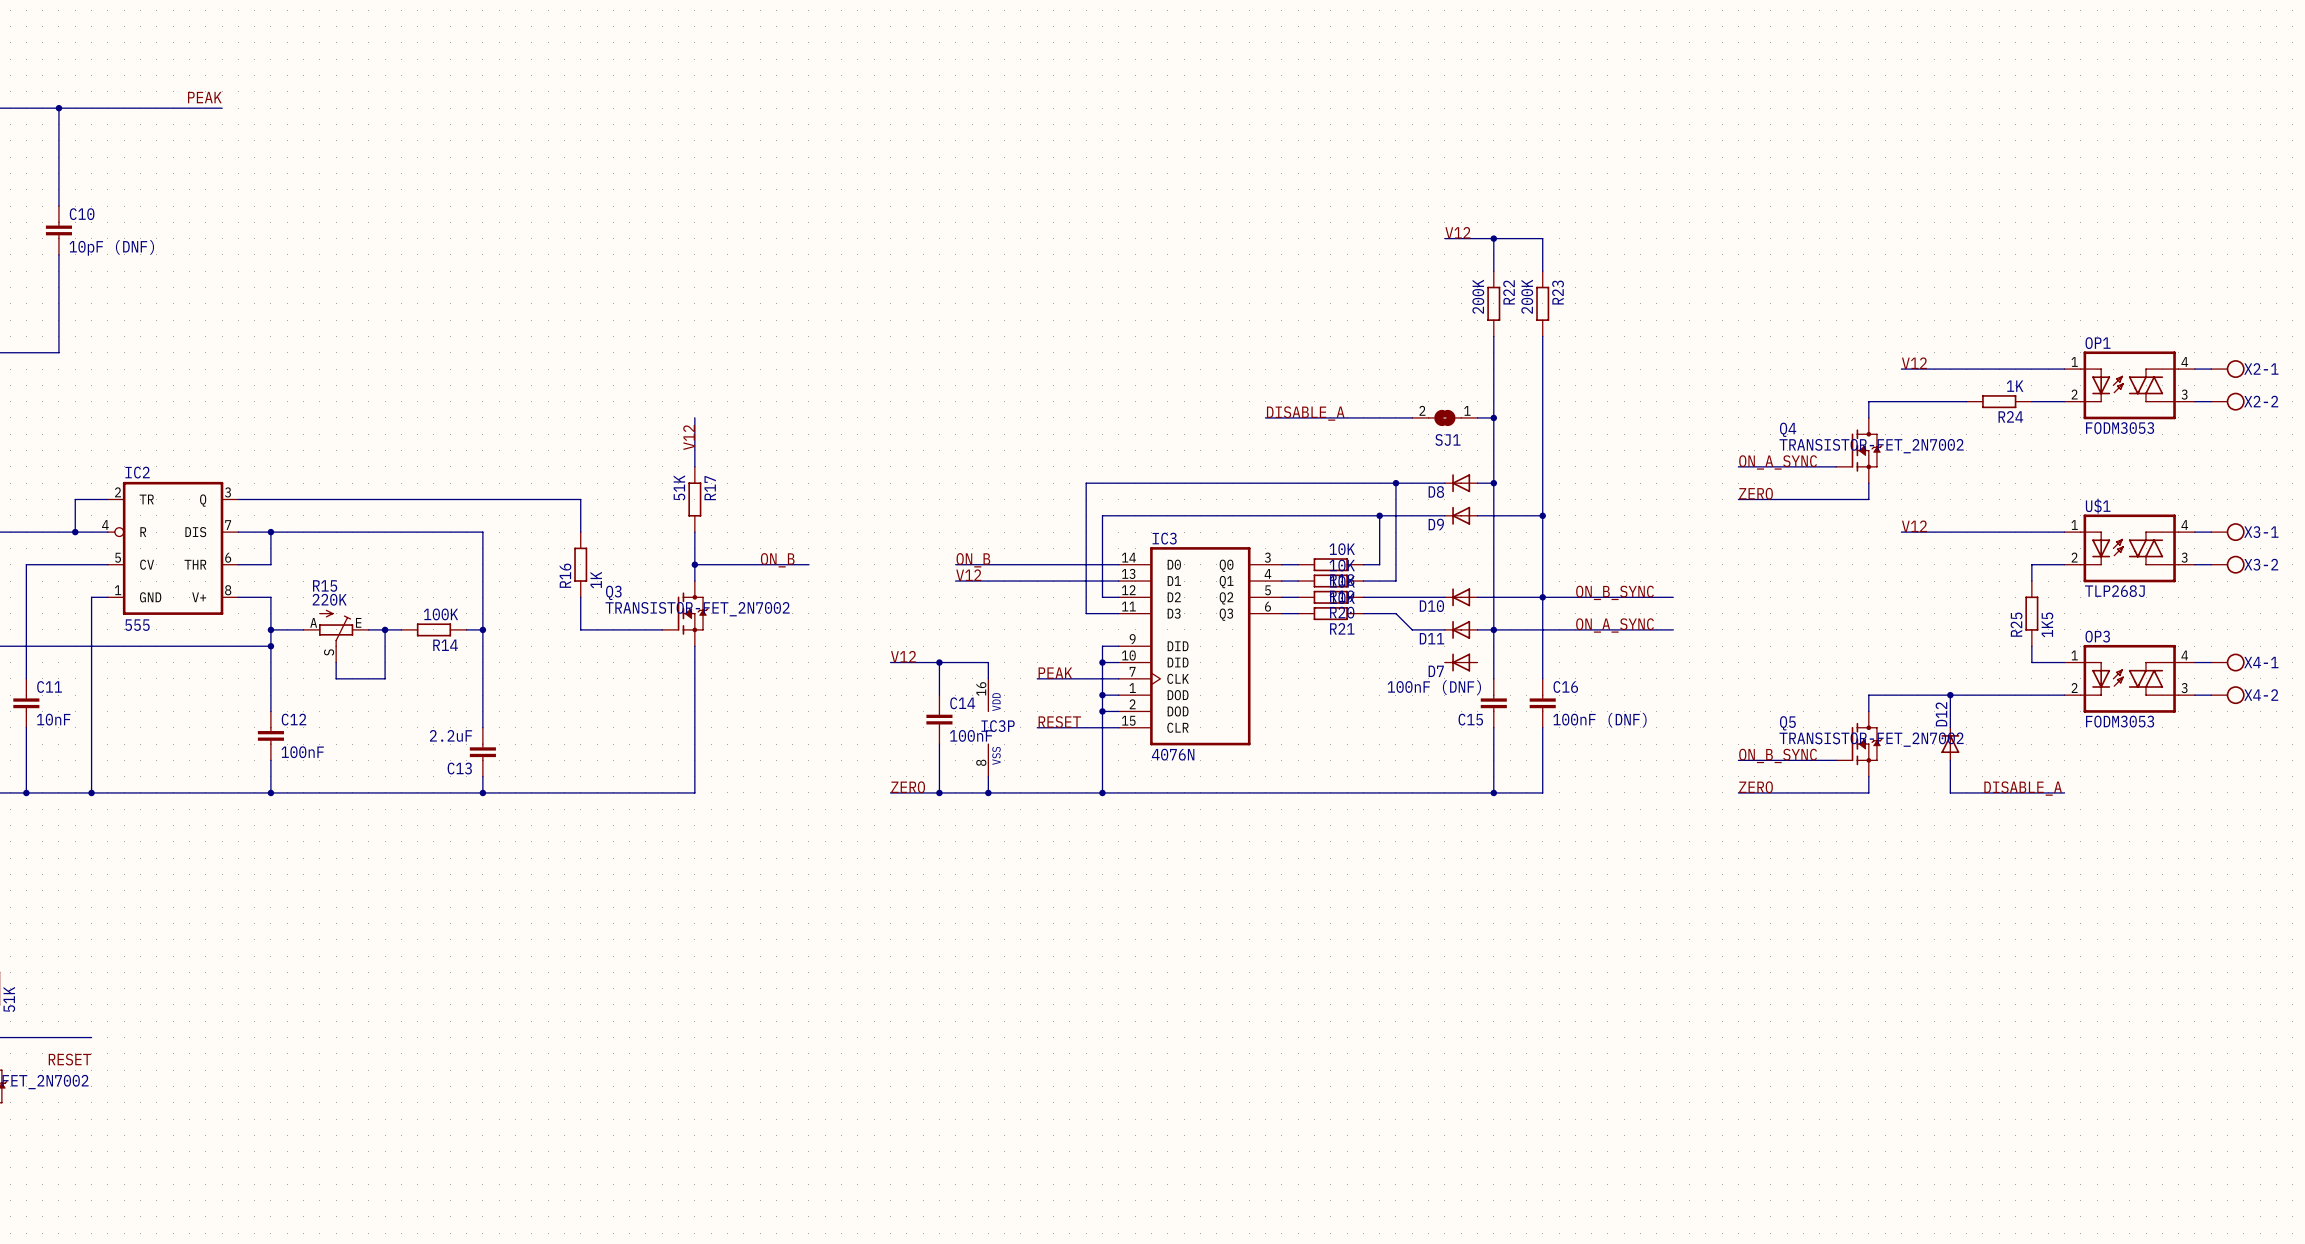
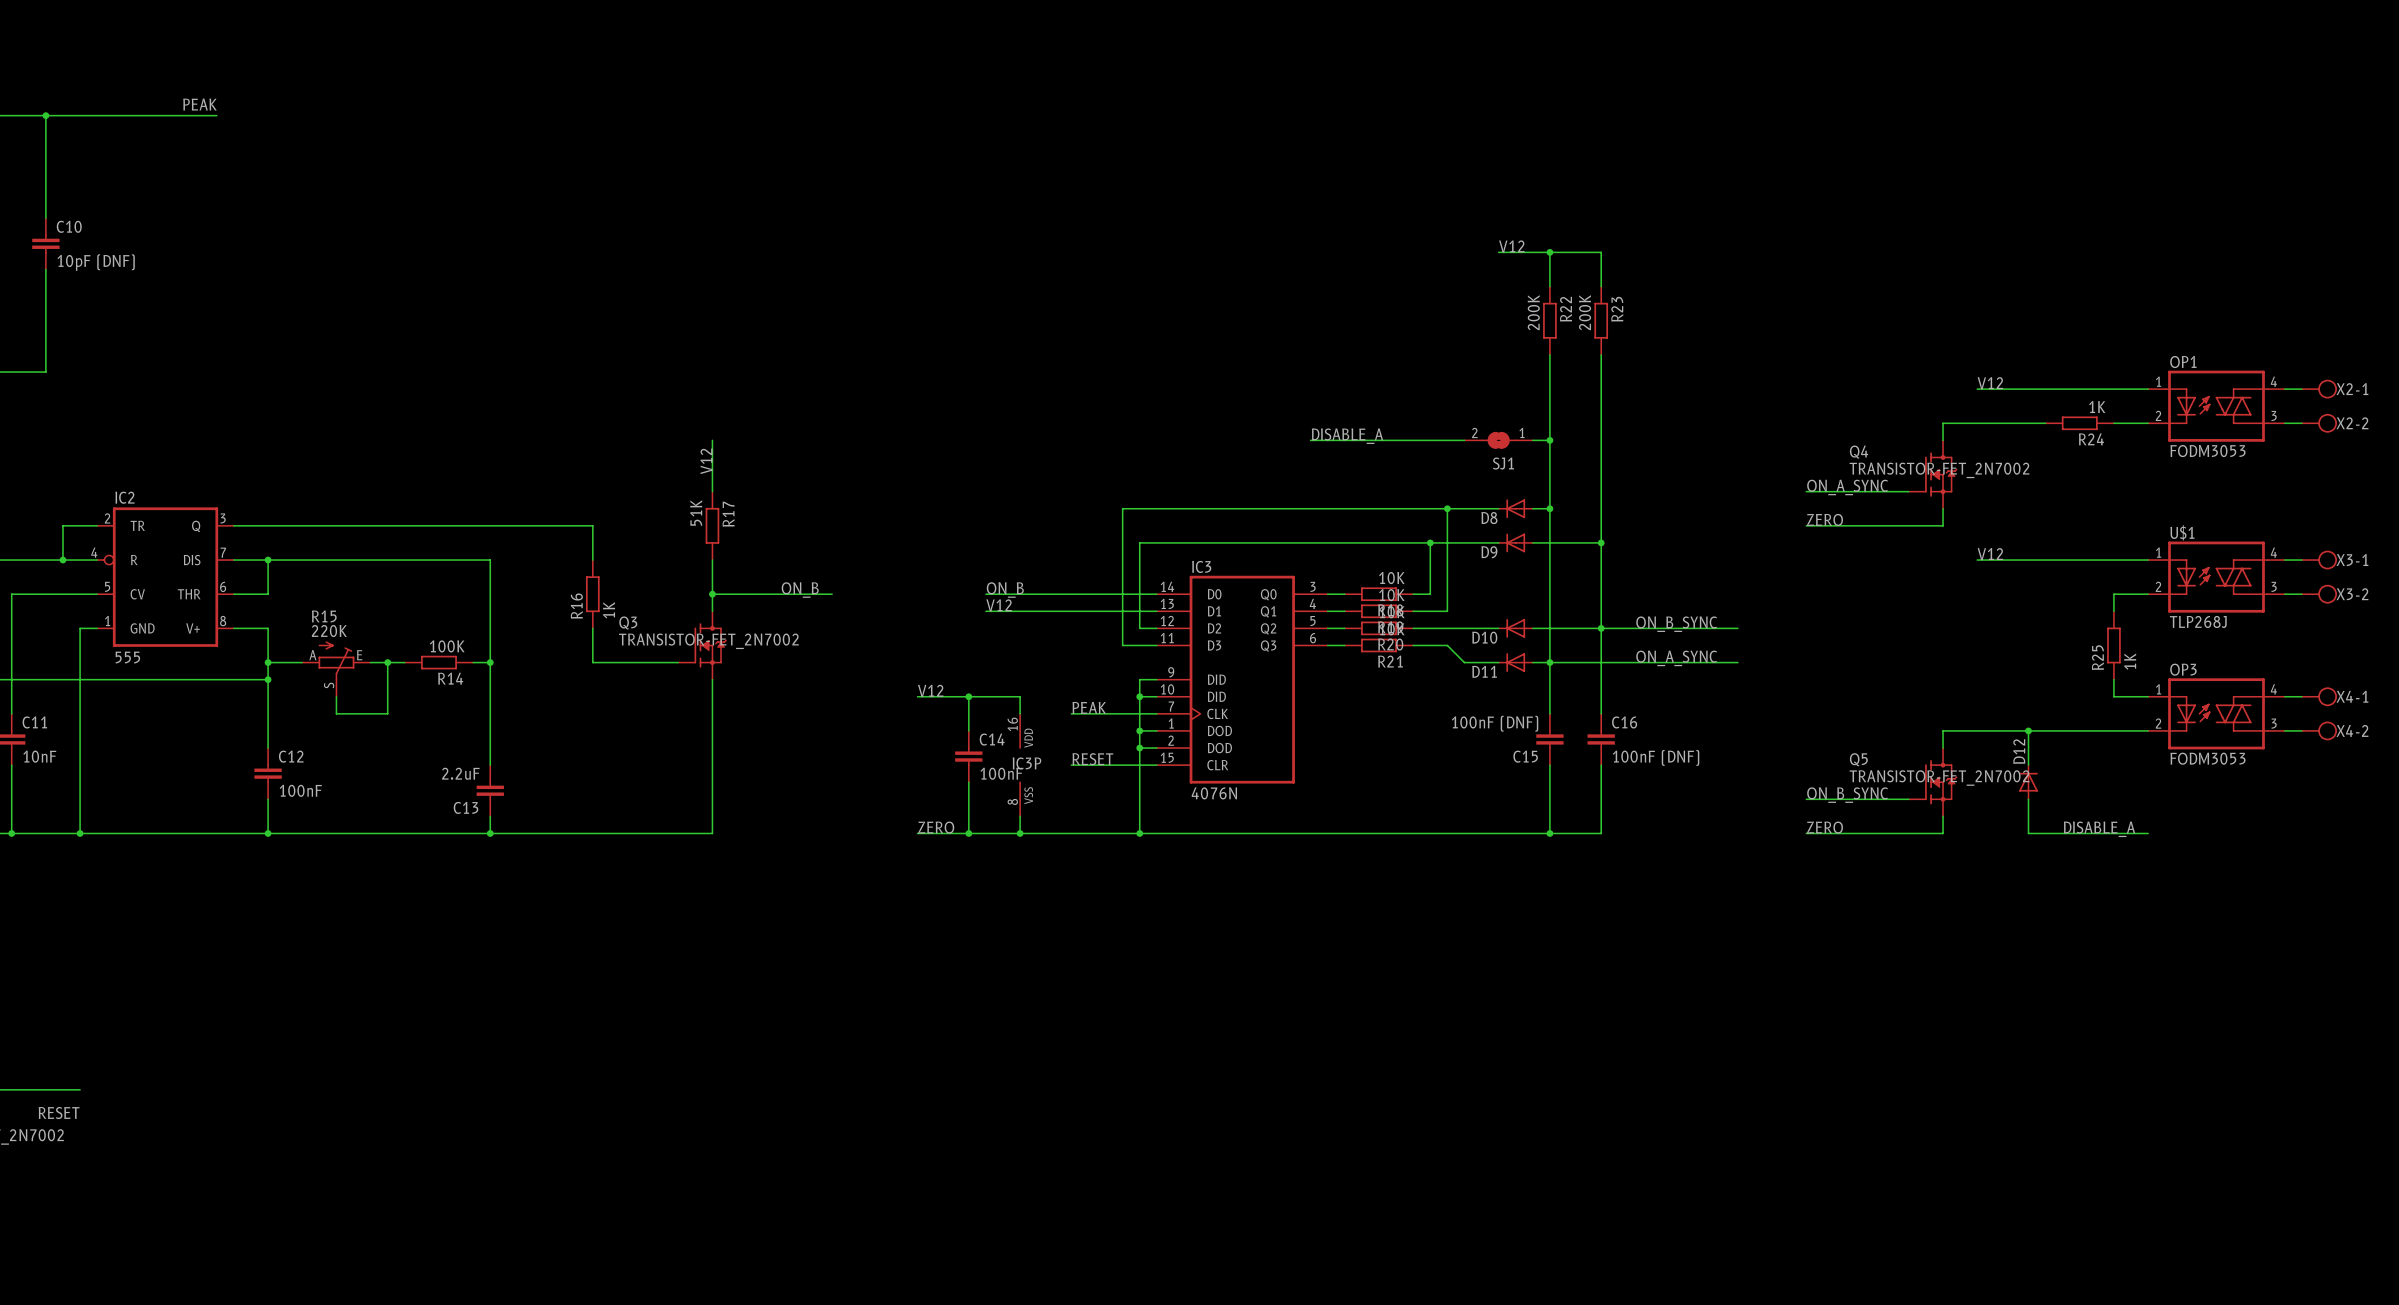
R25 value: 1K5 (2047, 624) -> 1K (2130, 661)
D7: (1461, 662) -> none

